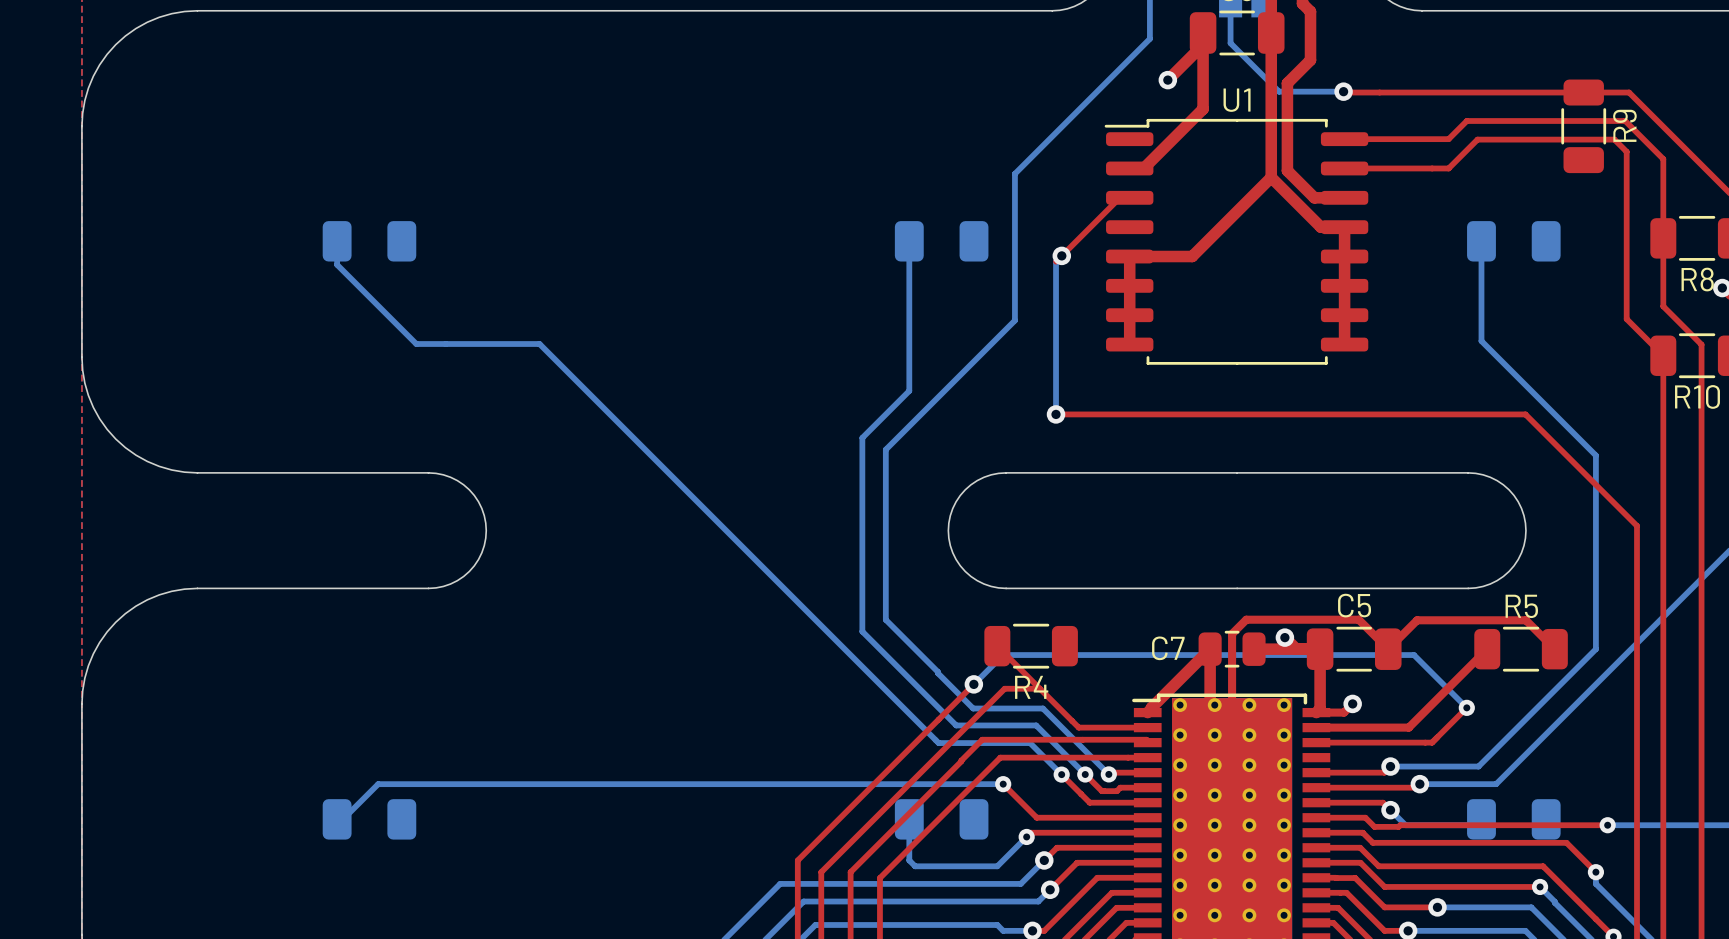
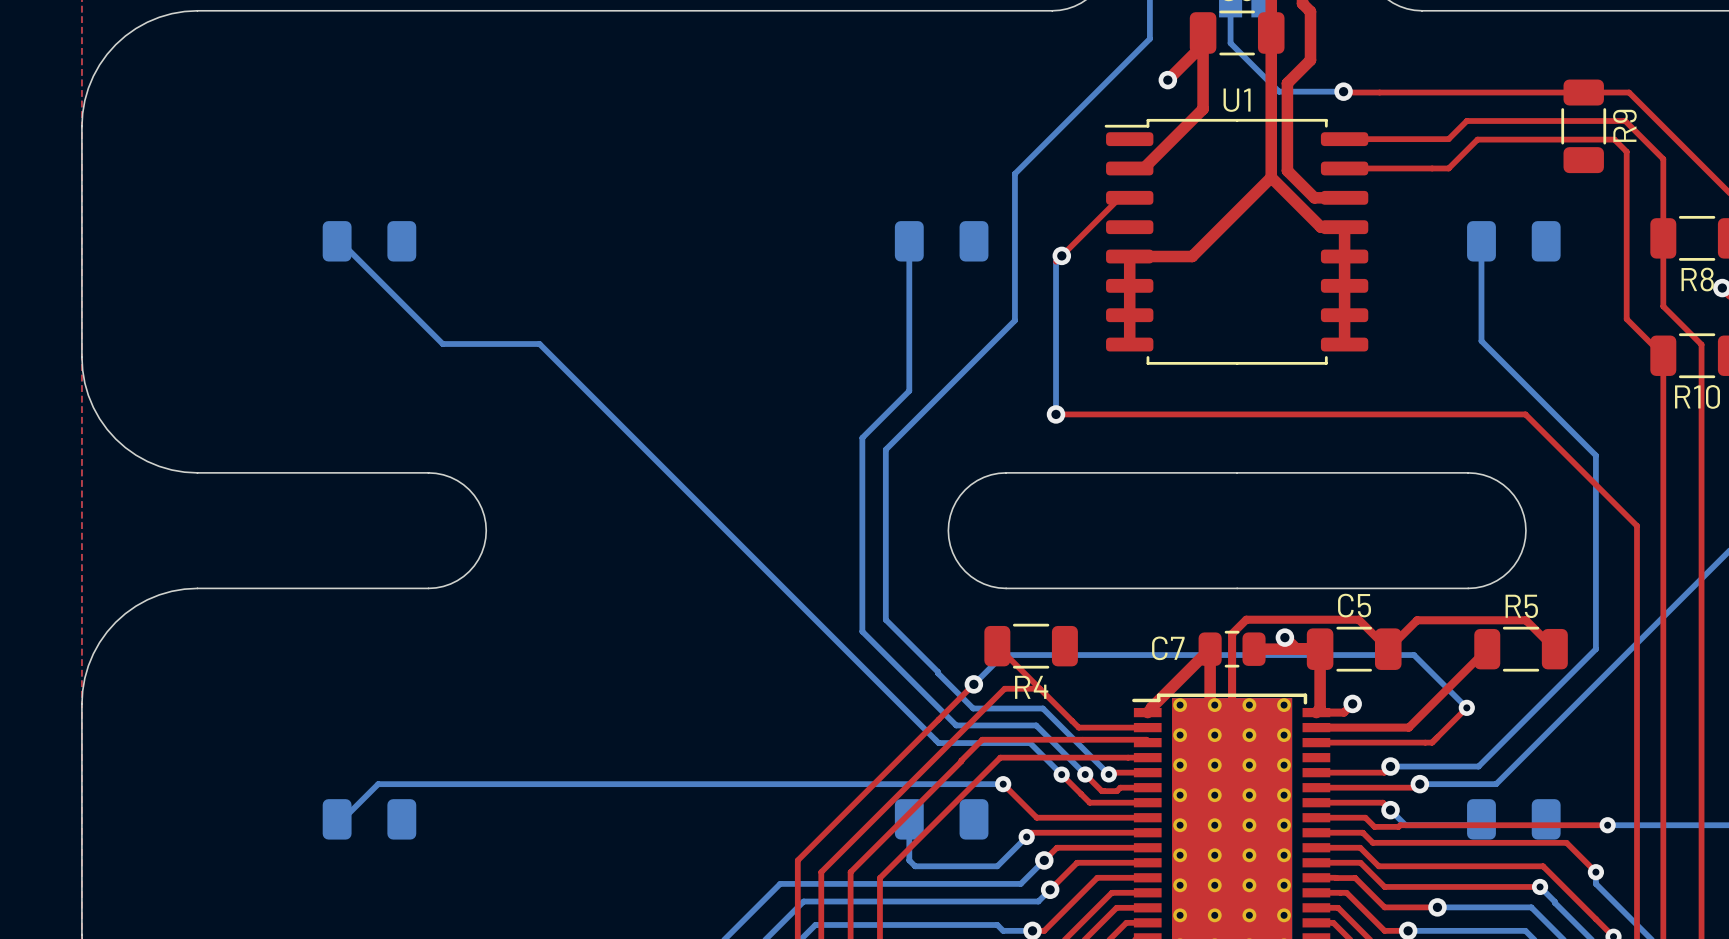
bottom track: (337, 241) (337, 264) (416, 344) (442, 344) -> (337, 238) (442, 344)

